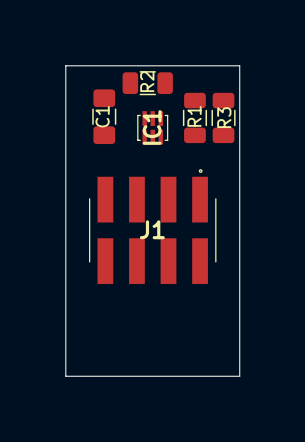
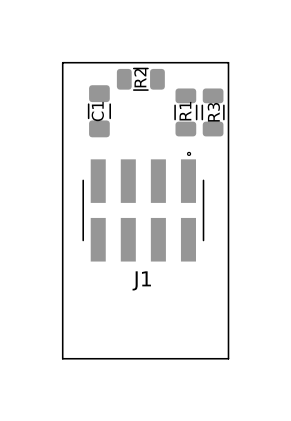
IC1: (152, 127) -> none
J1 footprint: [89, 169, 217, 284] -> [82, 151, 205, 262]
J1 name position: J1 (152, 229) -> J1 (141, 280)

